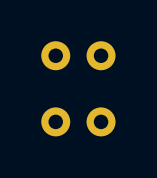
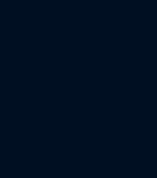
part: (78, 55) -> none
part: (78, 121) -> none

